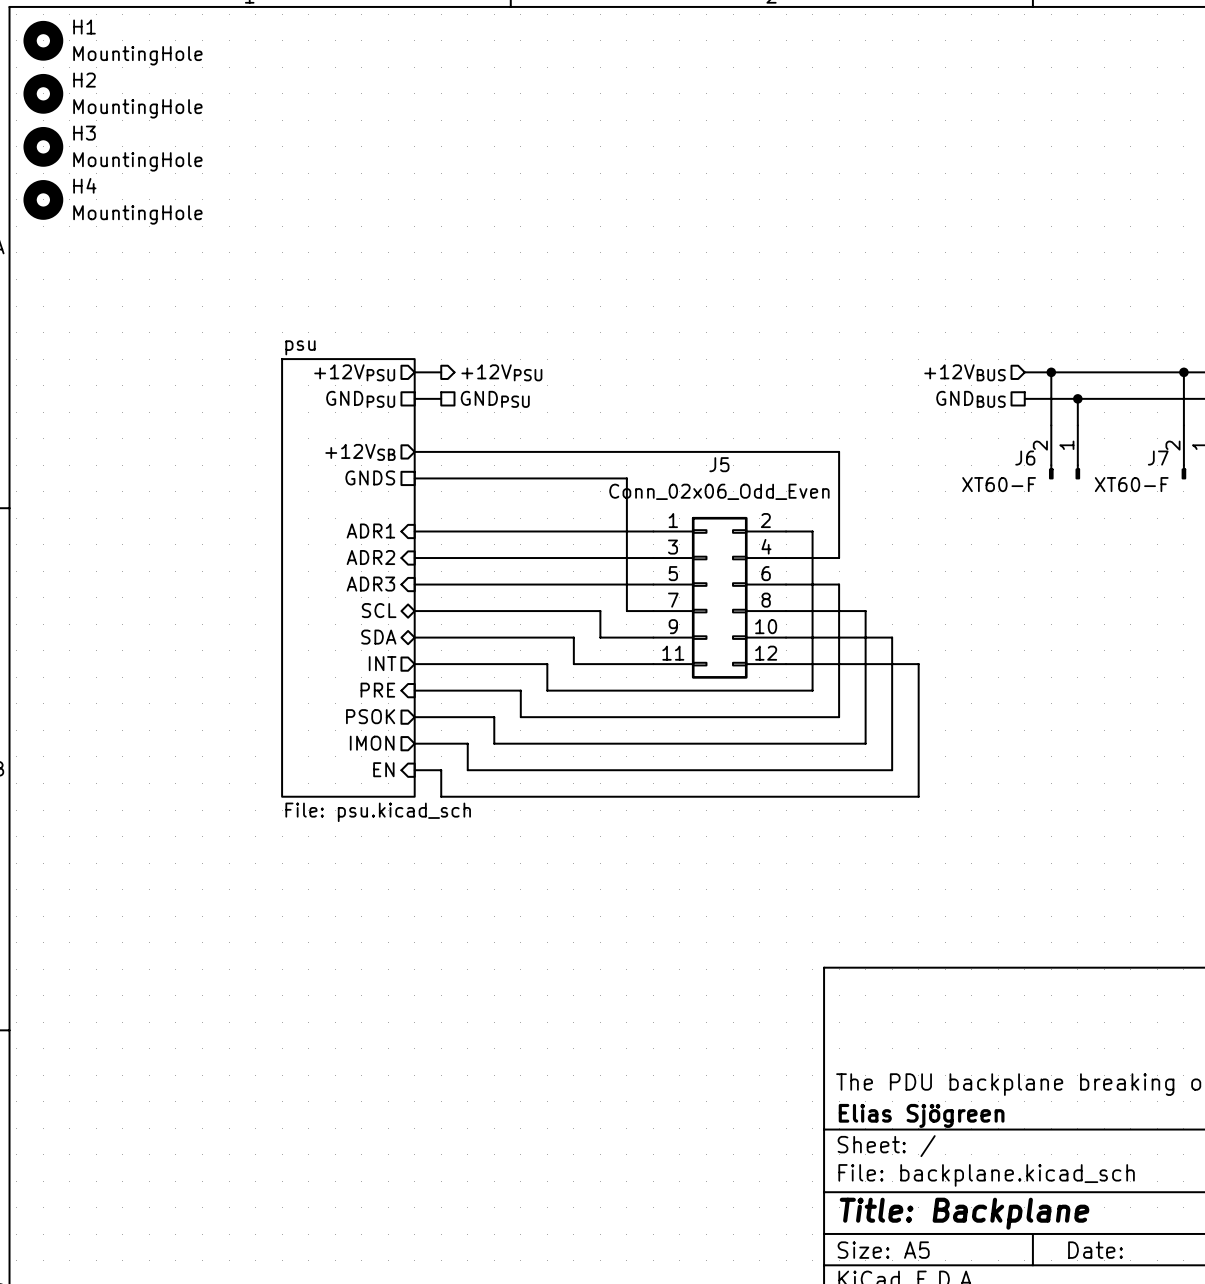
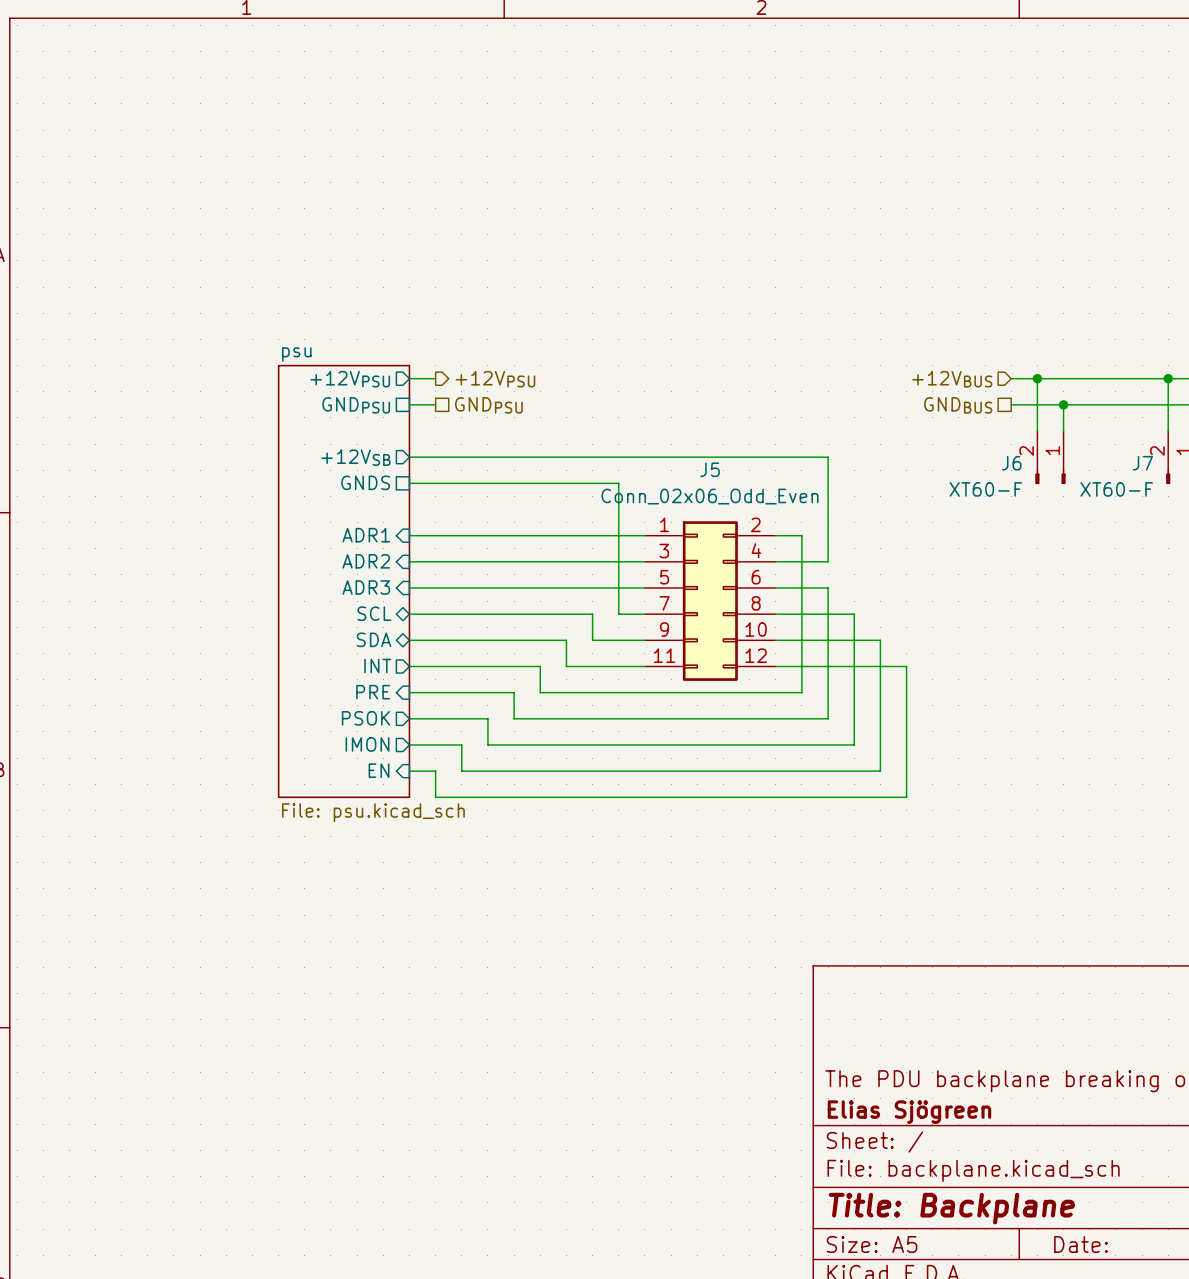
H1: MountingHole (43, 40) -> none
H2: MountingHole (43, 93) -> none
H3: MountingHole (43, 146) -> none
H4: MountingHole (43, 199) -> none

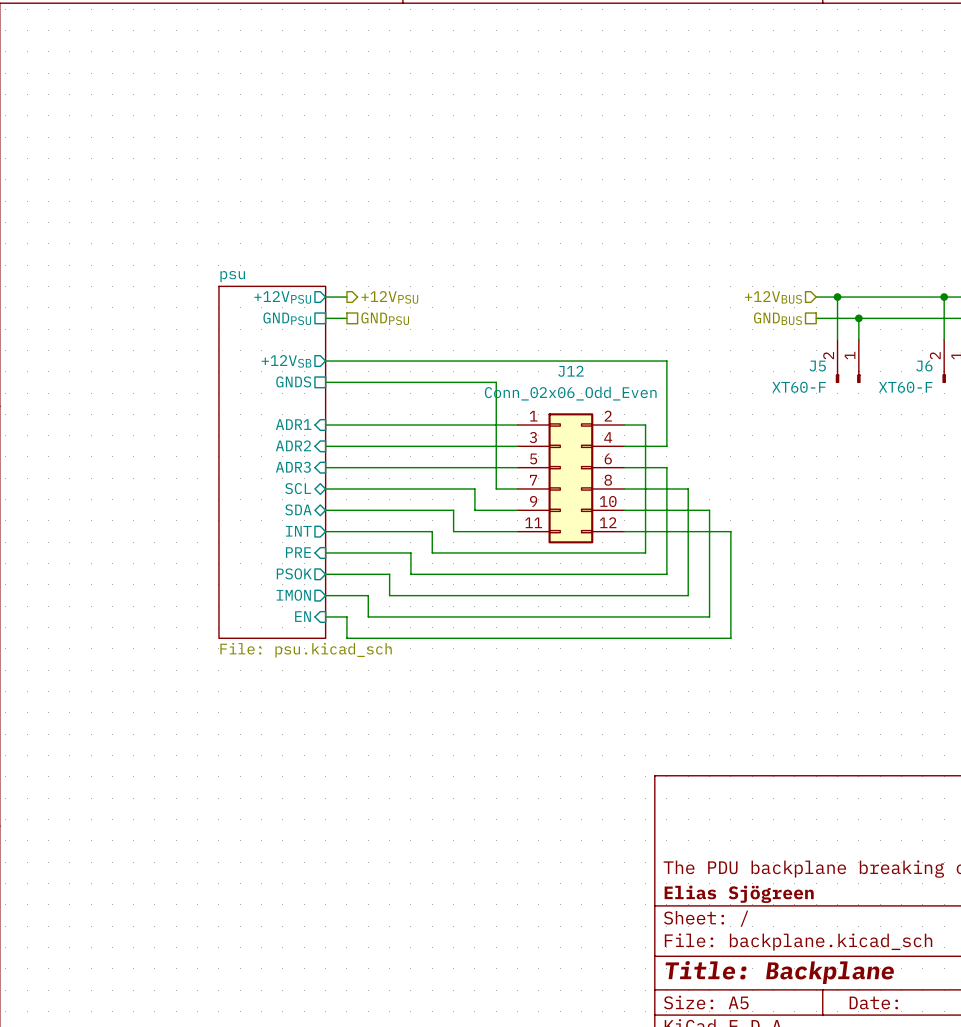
J6 name: J6 (1011, 463) -> J5 (817, 366)
J7 name: J7 (1142, 463) -> J6 (924, 366)
J5 name: J5 (710, 469) -> J12 (571, 371)

